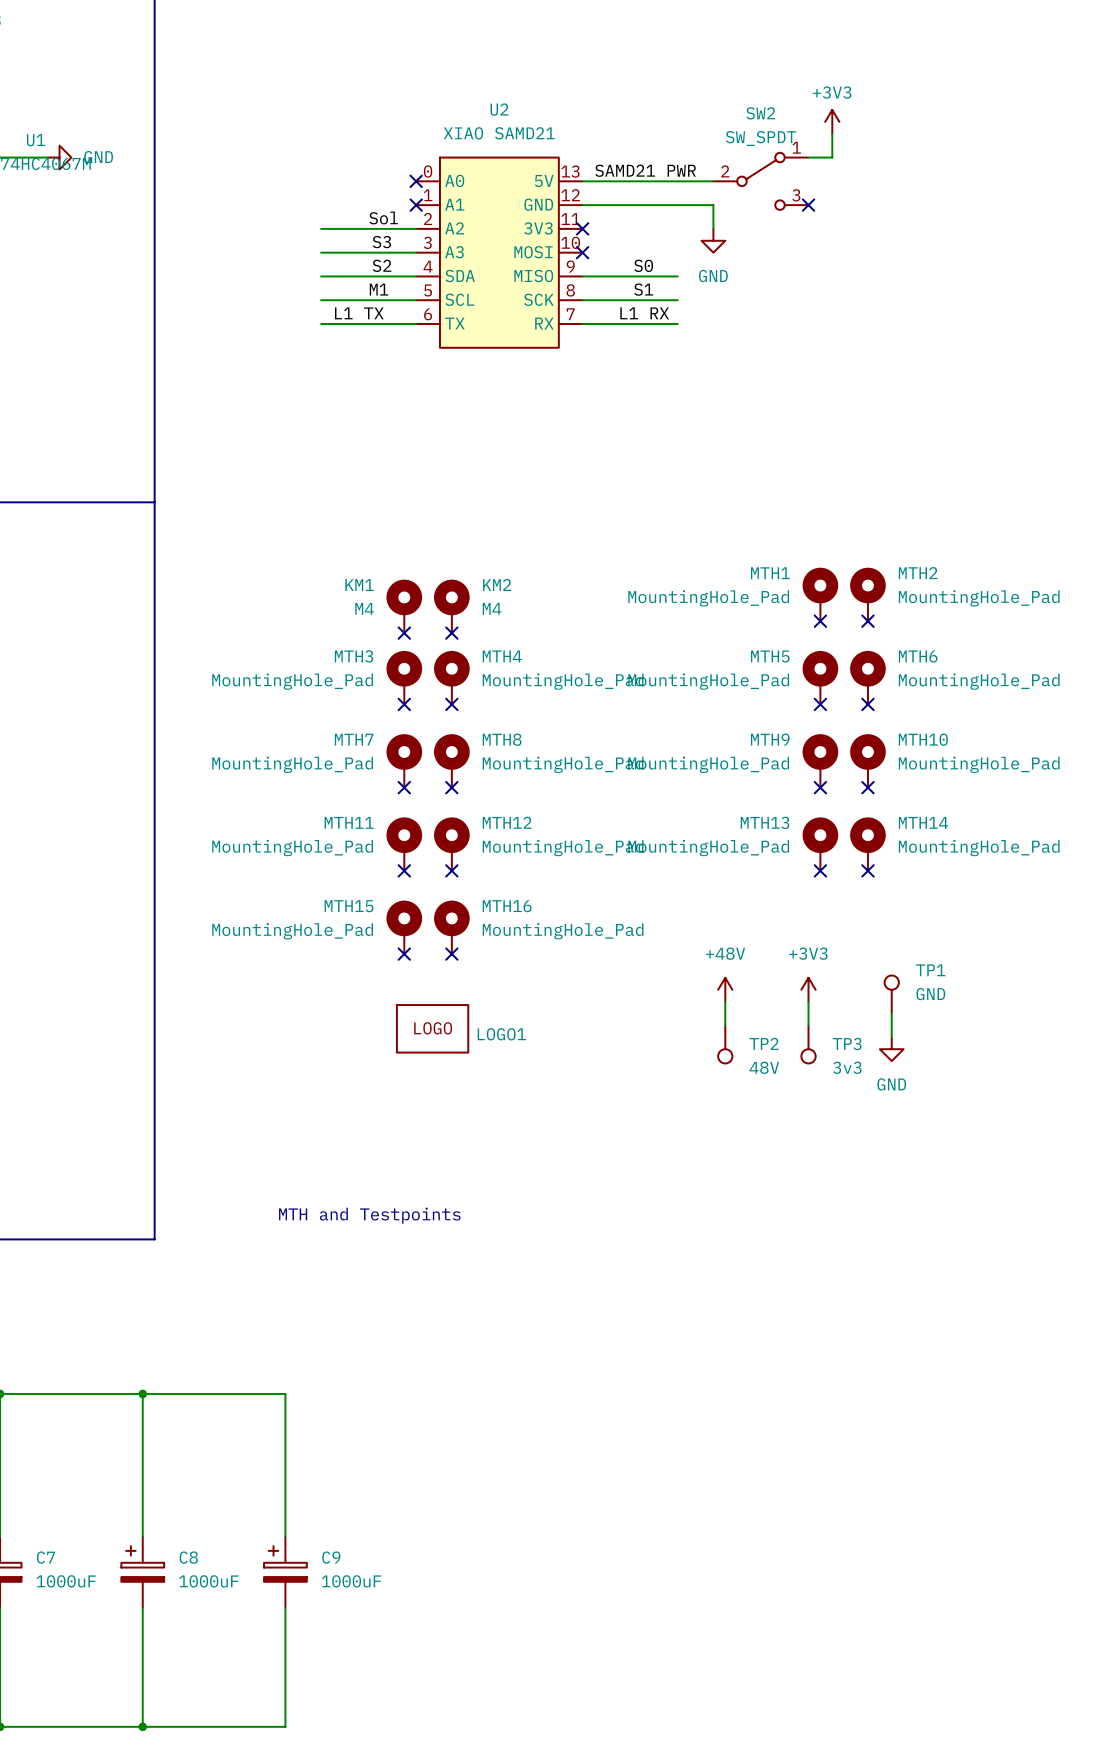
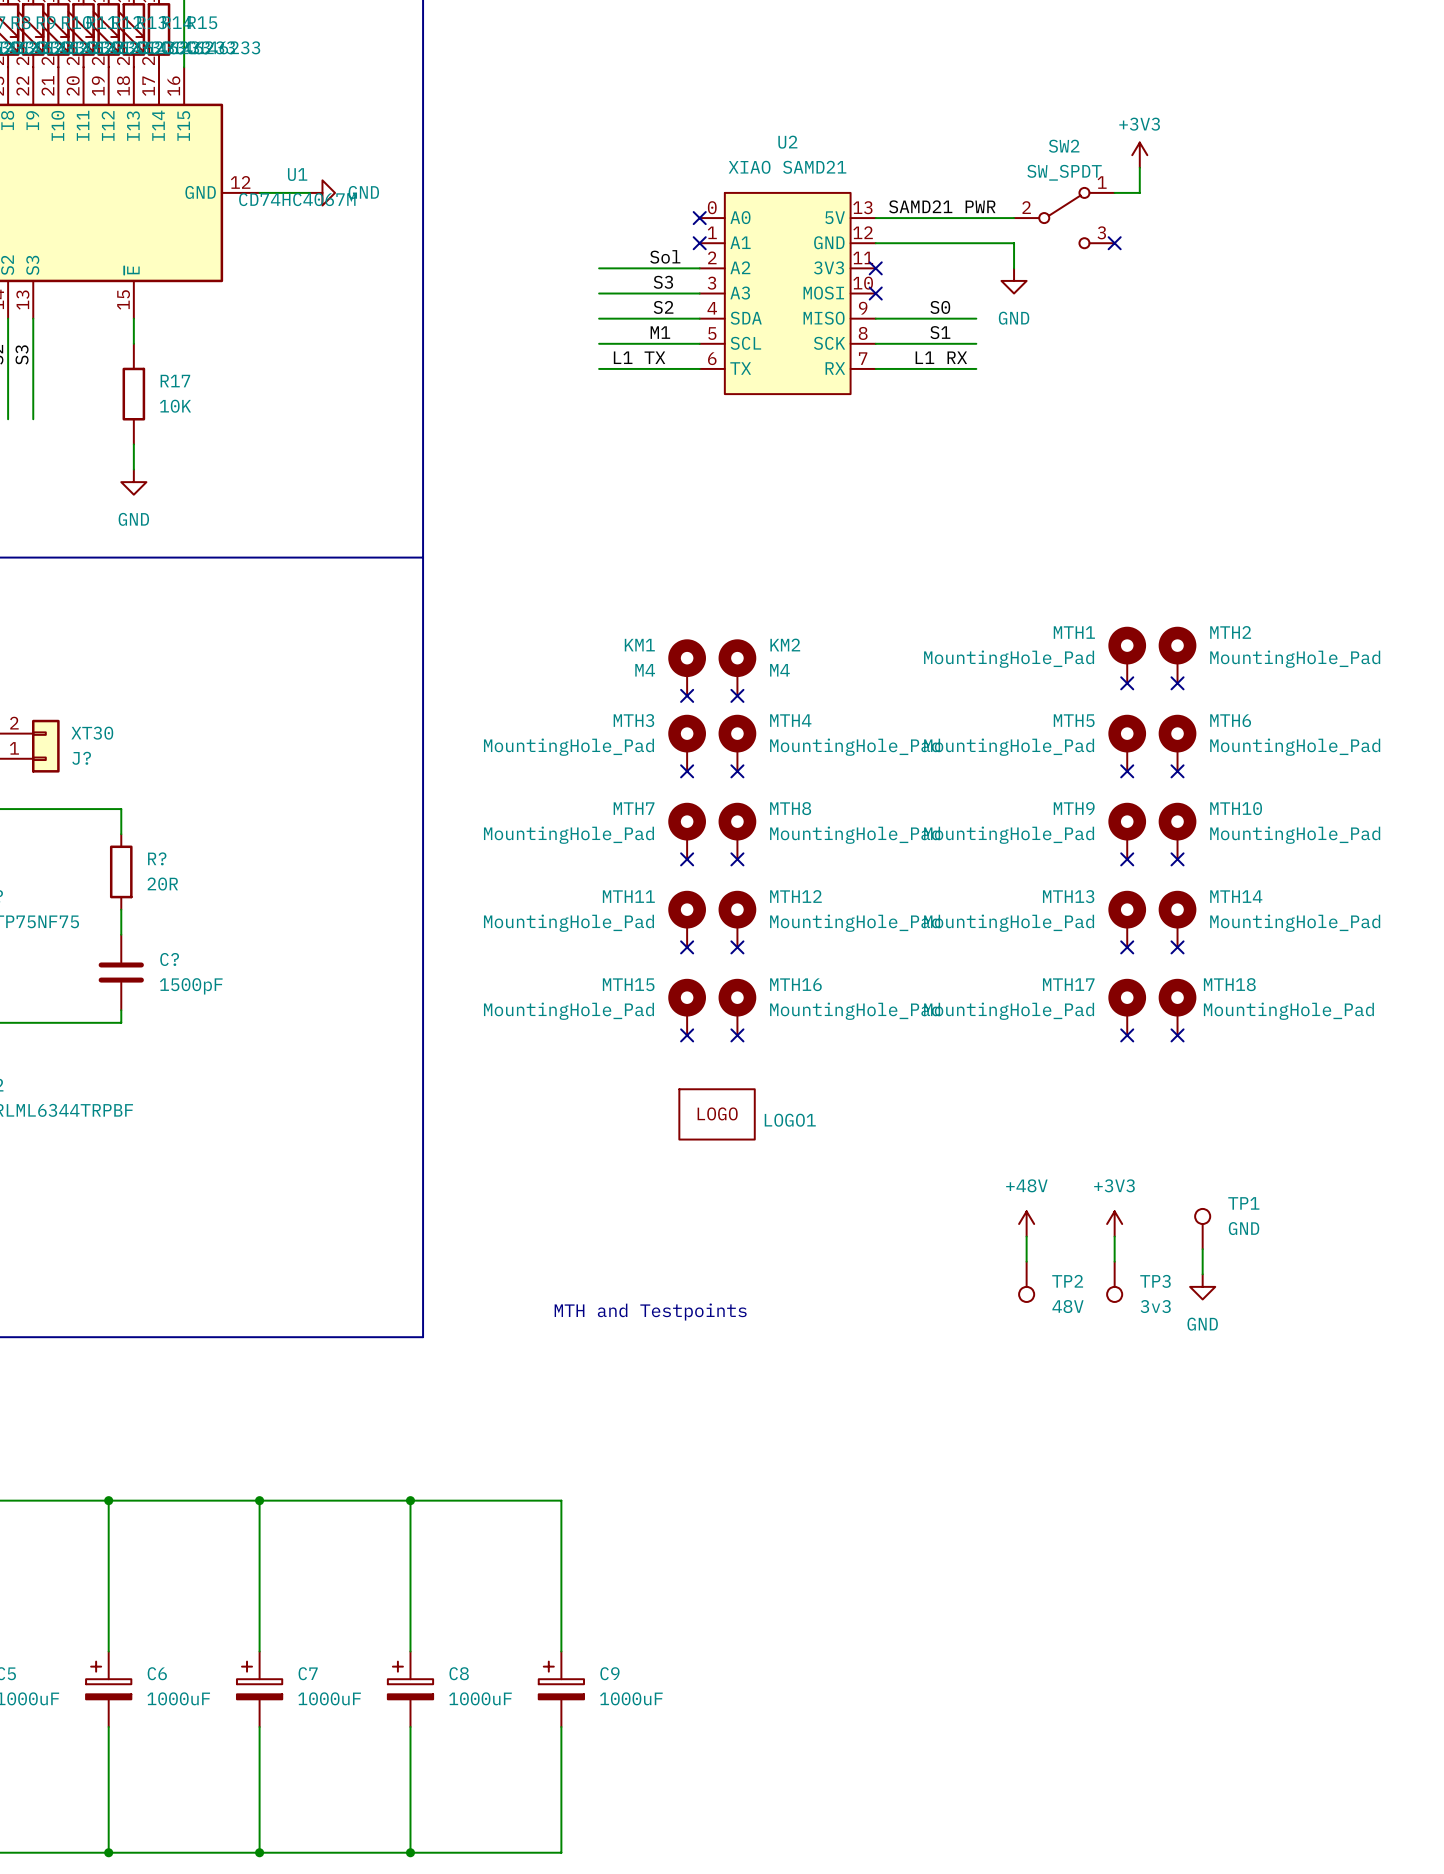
MTH17: none -> MountingHole_Pad (1127, 1007)
MTH18: none -> MountingHole_Pad (1177, 1007)
no-connect mark: none -> (1127, 1035)
no-connect mark: none -> (1177, 1035)
power symbol position: +48V (725, 989) -> +48V (1026, 1224)
power symbol position: +3V3 (808, 989) -> +3V3 (1114, 1224)
TP1 position: (891, 994) -> (1202, 1229)
wire: (725, 1001) (725, 1025) -> (1026, 1236) (1026, 1261)
wire: (808, 1001) (808, 1025) -> (1114, 1236) (1114, 1261)
wire: (891, 1013) (891, 1037) -> (1202, 1249) (1202, 1274)
TP2 position: (725, 1044) -> (1026, 1281)
TP3 position: (808, 1044) -> (1114, 1281)
power symbol position: GND (891, 1049) -> GND (1202, 1286)

